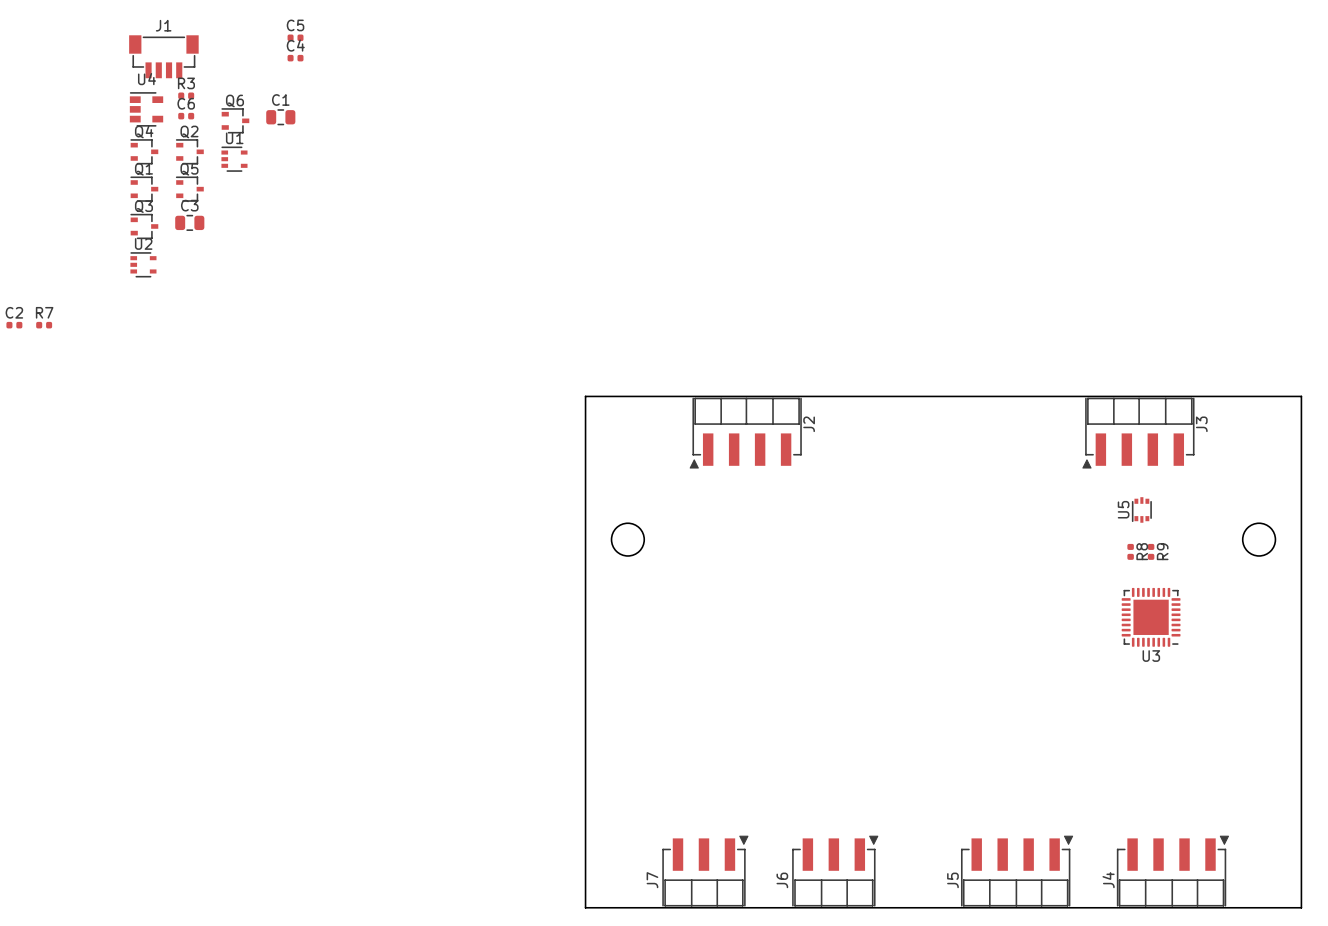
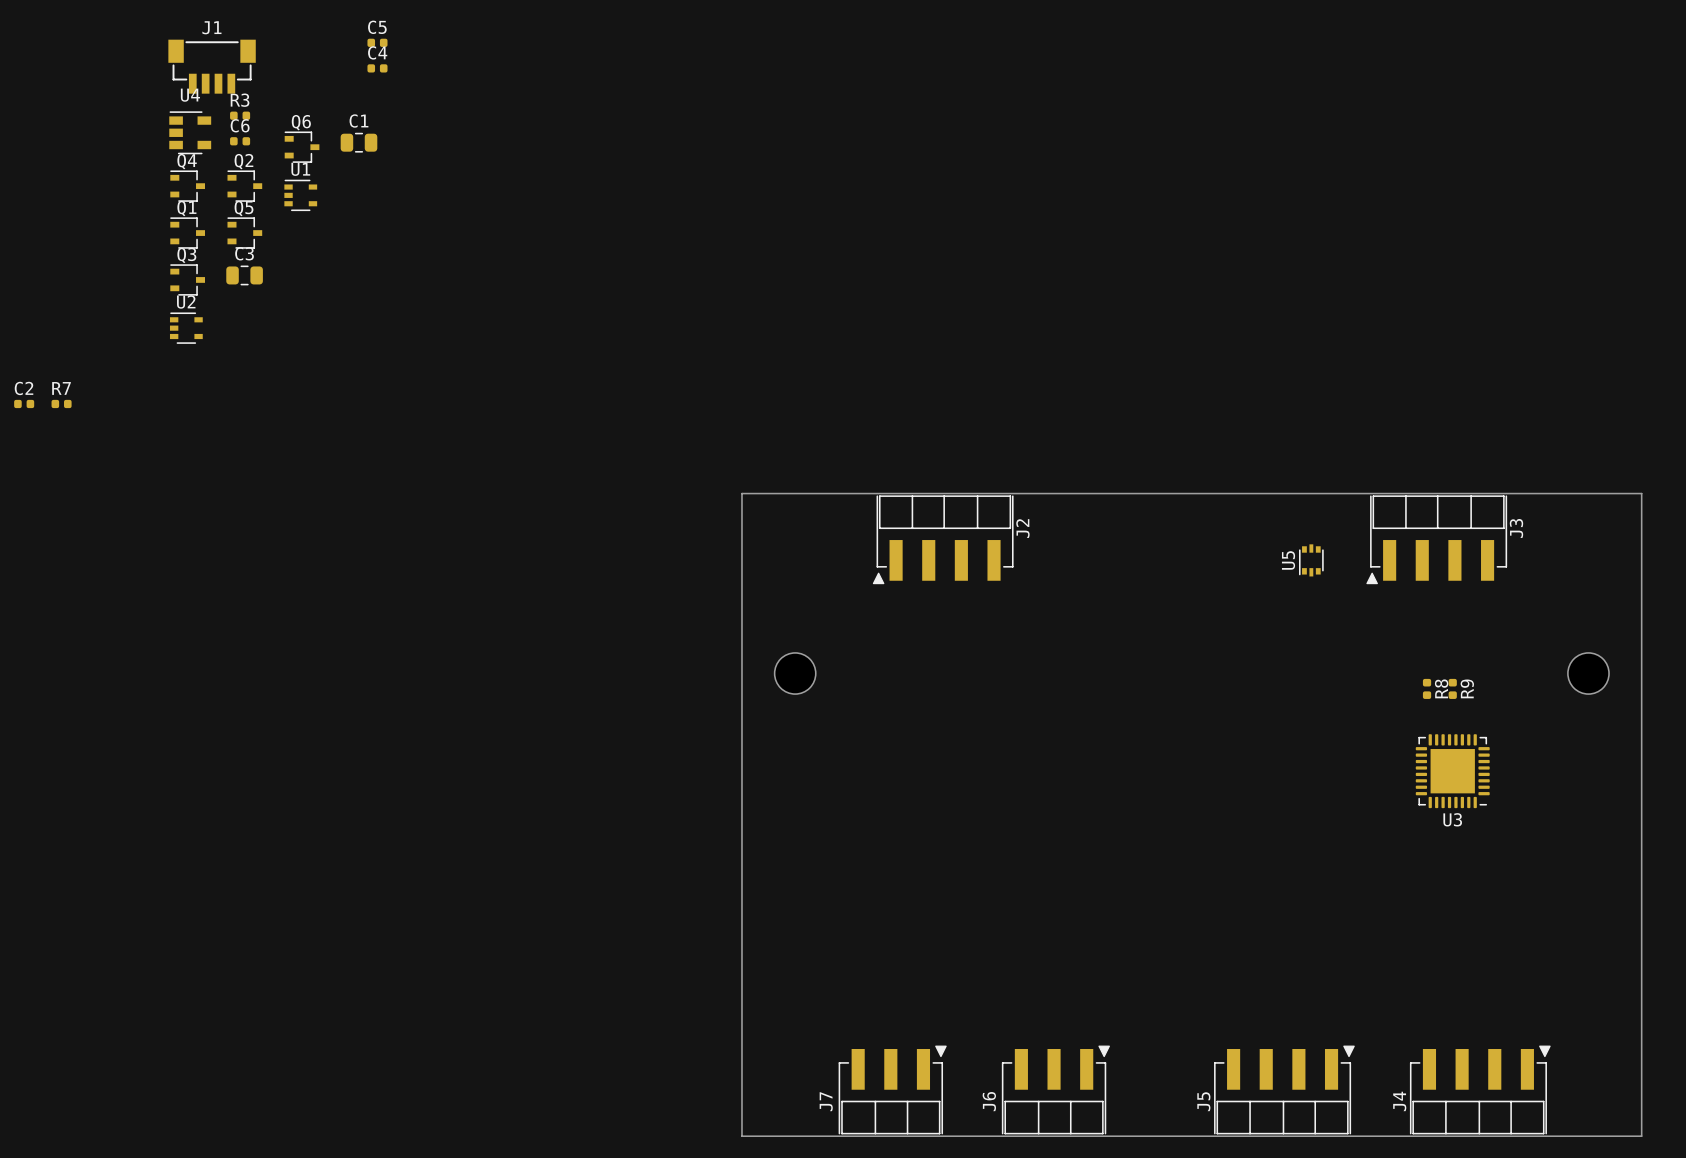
U5 position: (1141, 509) -> (1311, 560)

